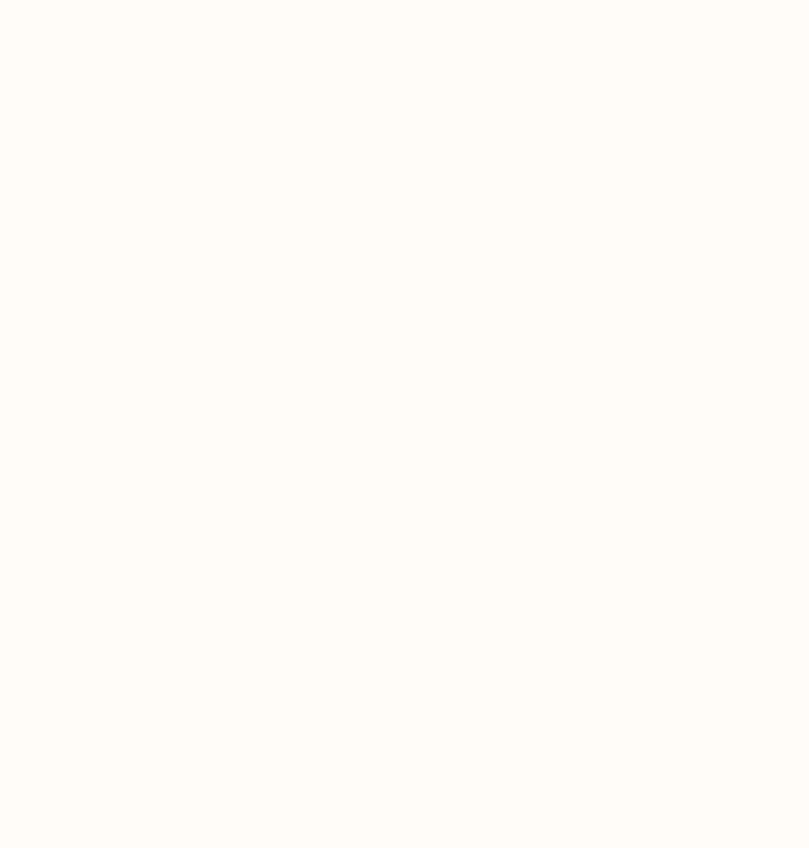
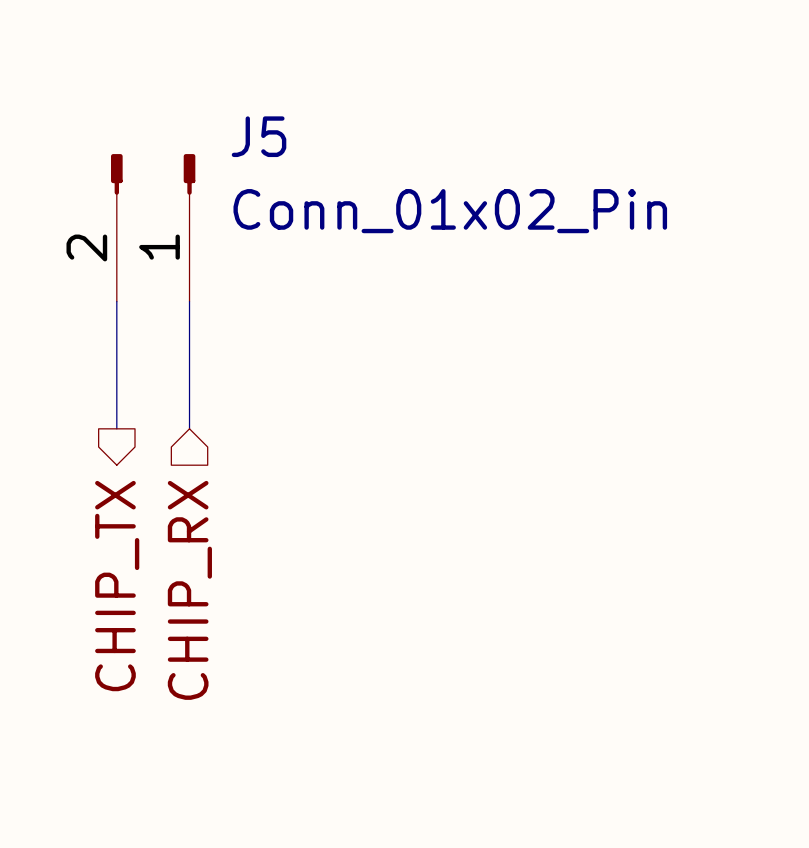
J5: none -> Conn_01x02_Pin (153, 227)
wire: none -> (116, 301) (116, 428)
wire: none -> (189, 301) (189, 428)
hierarchical label: none -> CHIP_TX (117, 586)
hierarchical label: none -> CHIP_RX (189, 590)

